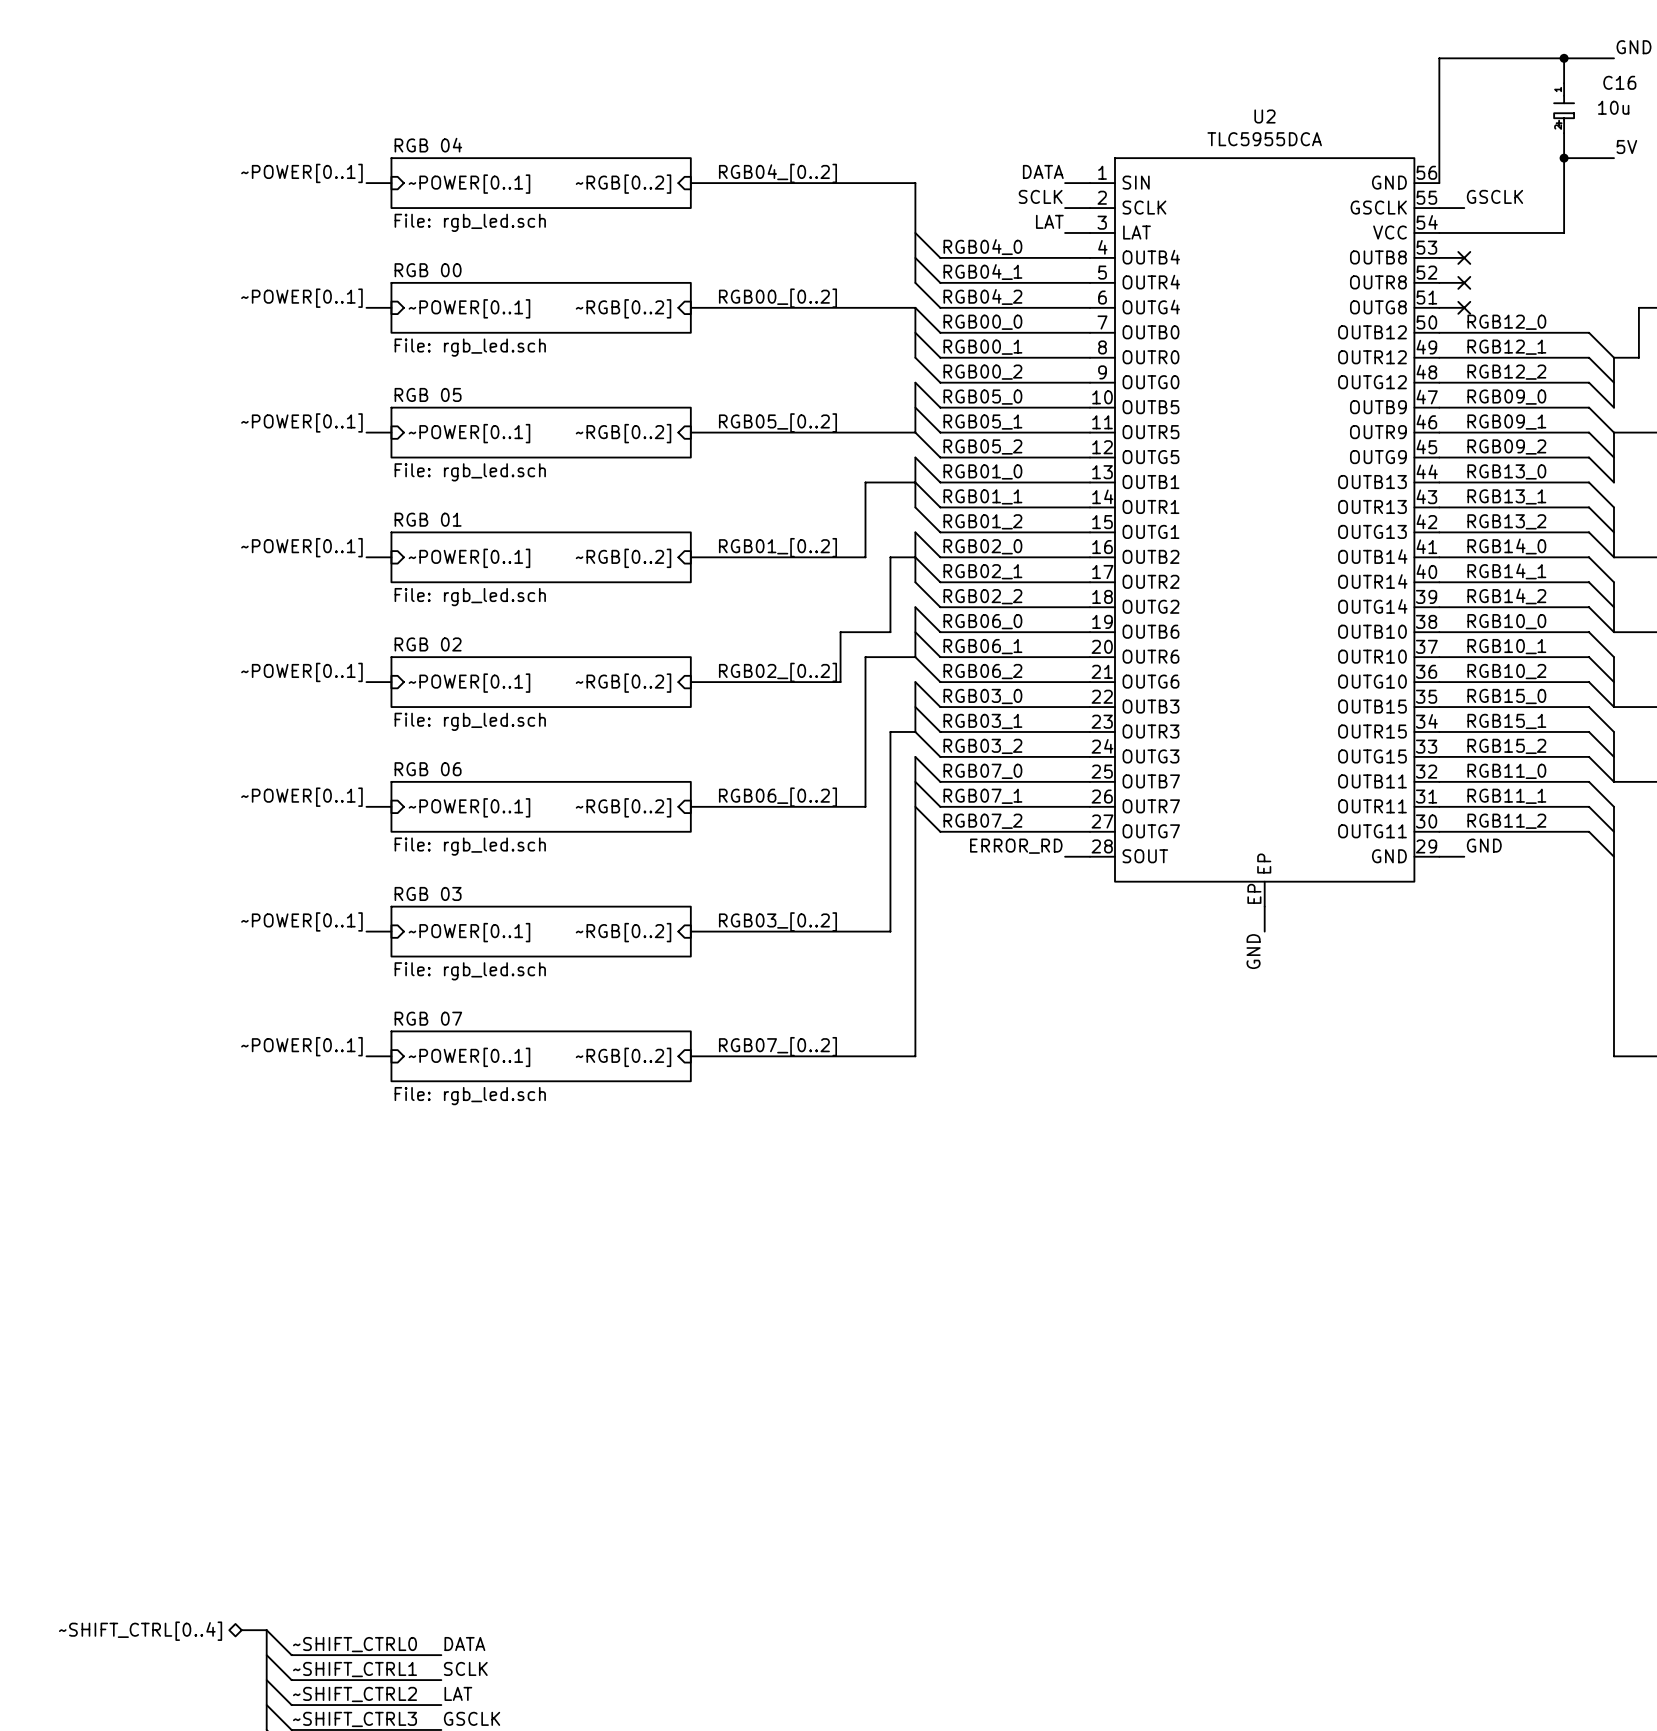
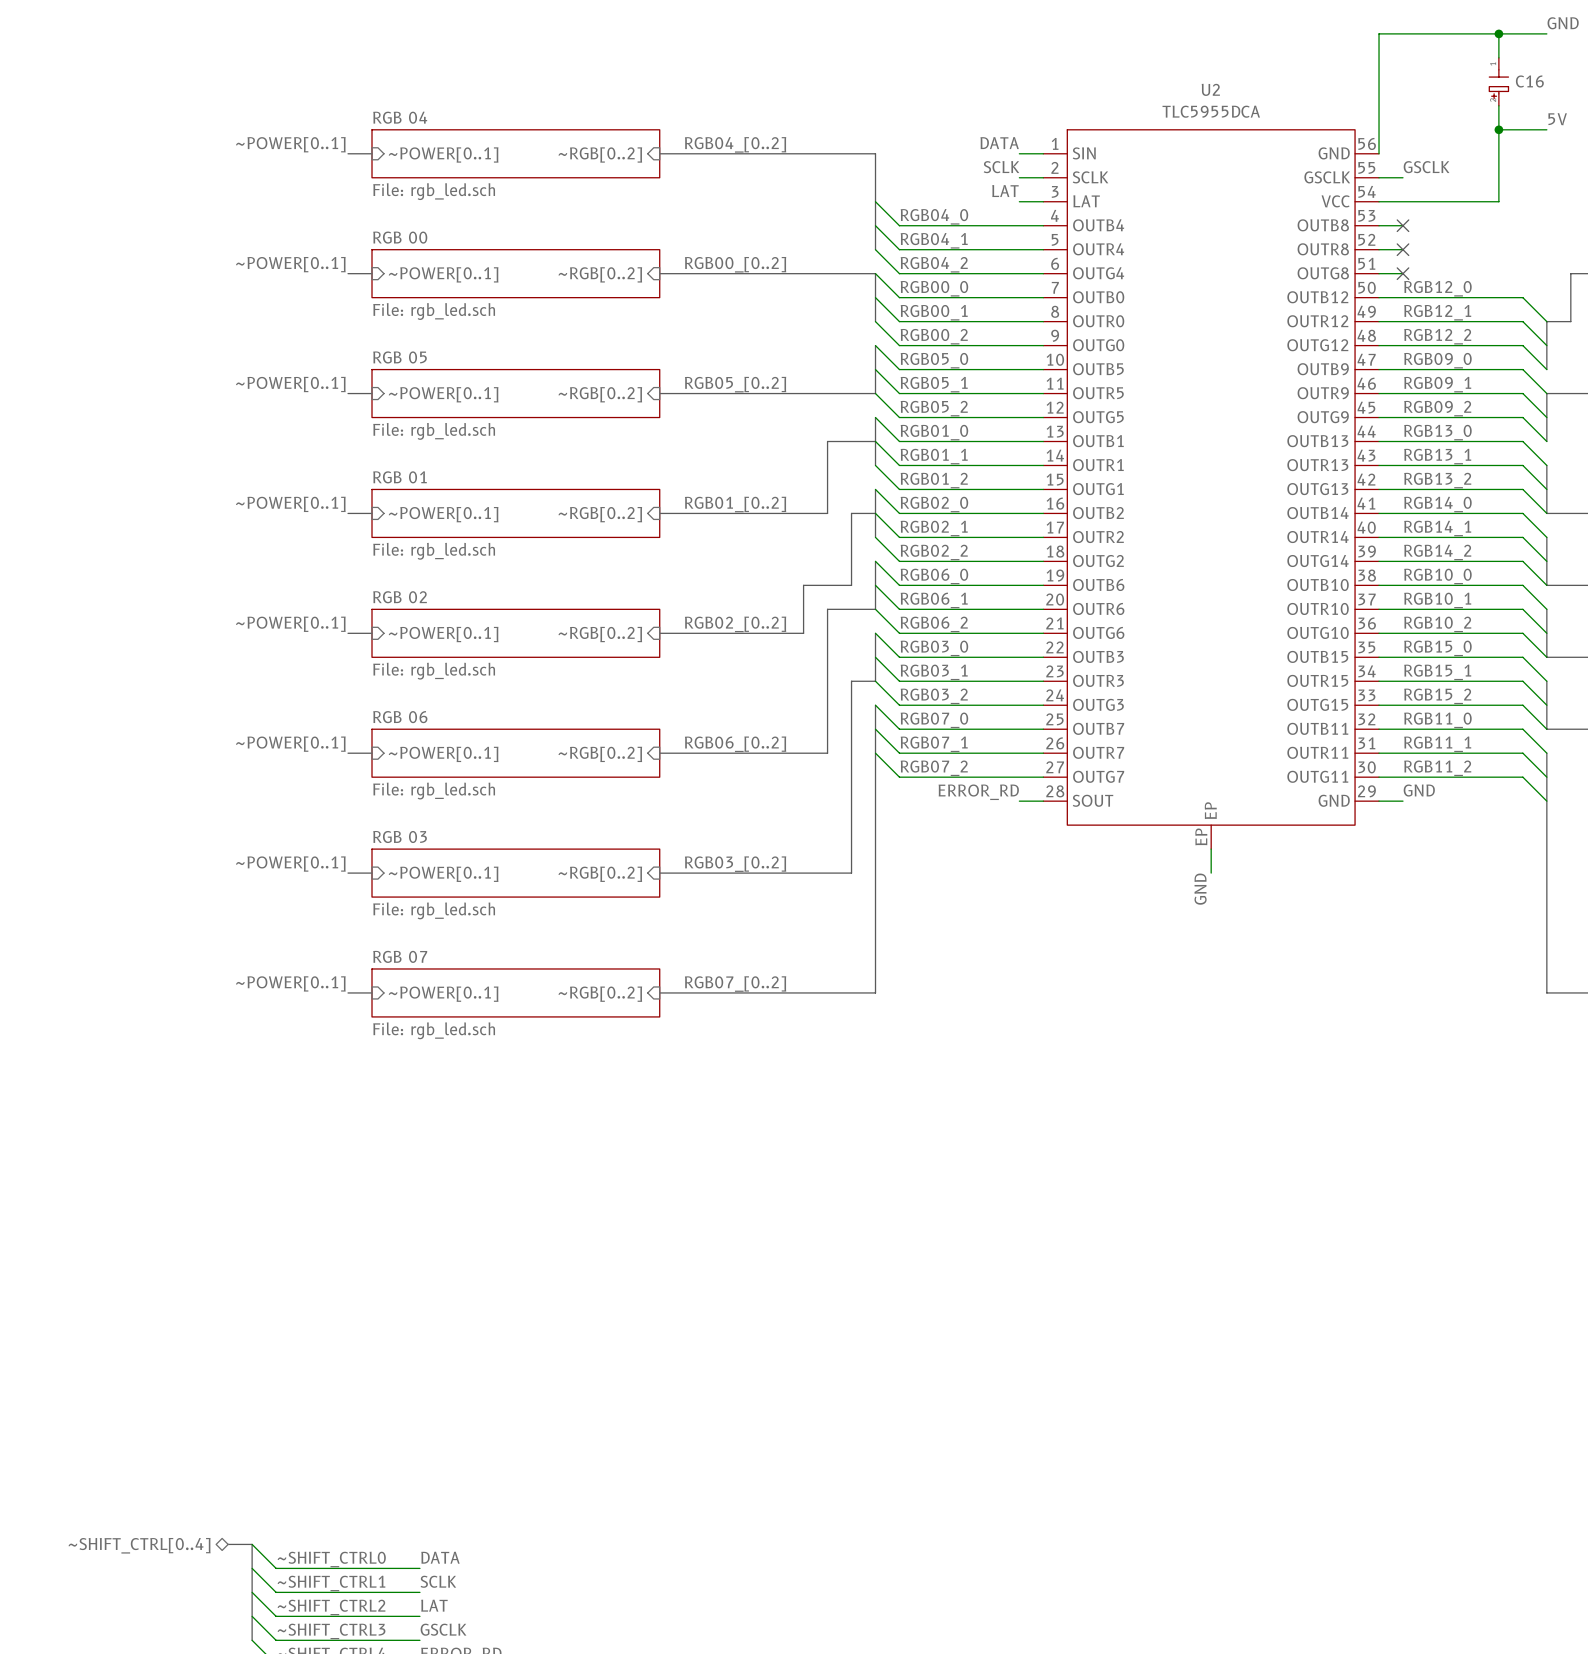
C16 name position: C16 (1619, 82) -> C16 (1529, 81)
C16 value: 10u (1613, 107) -> none

